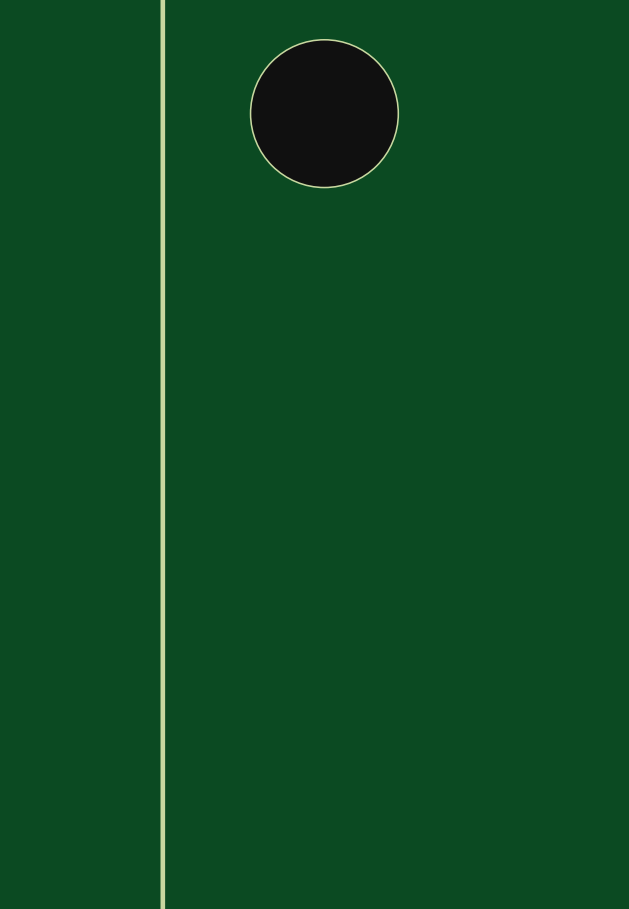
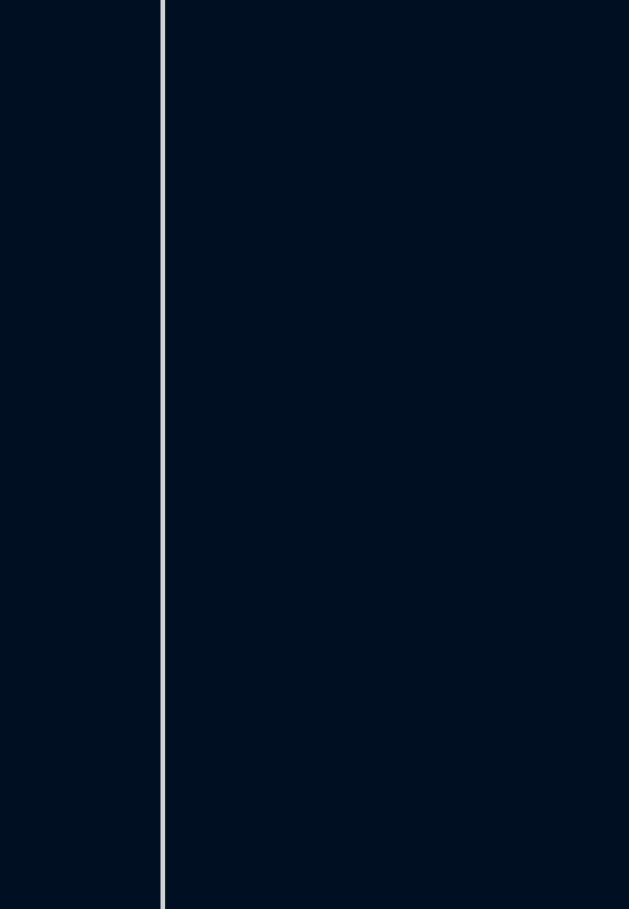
part: (324, 113) -> none

